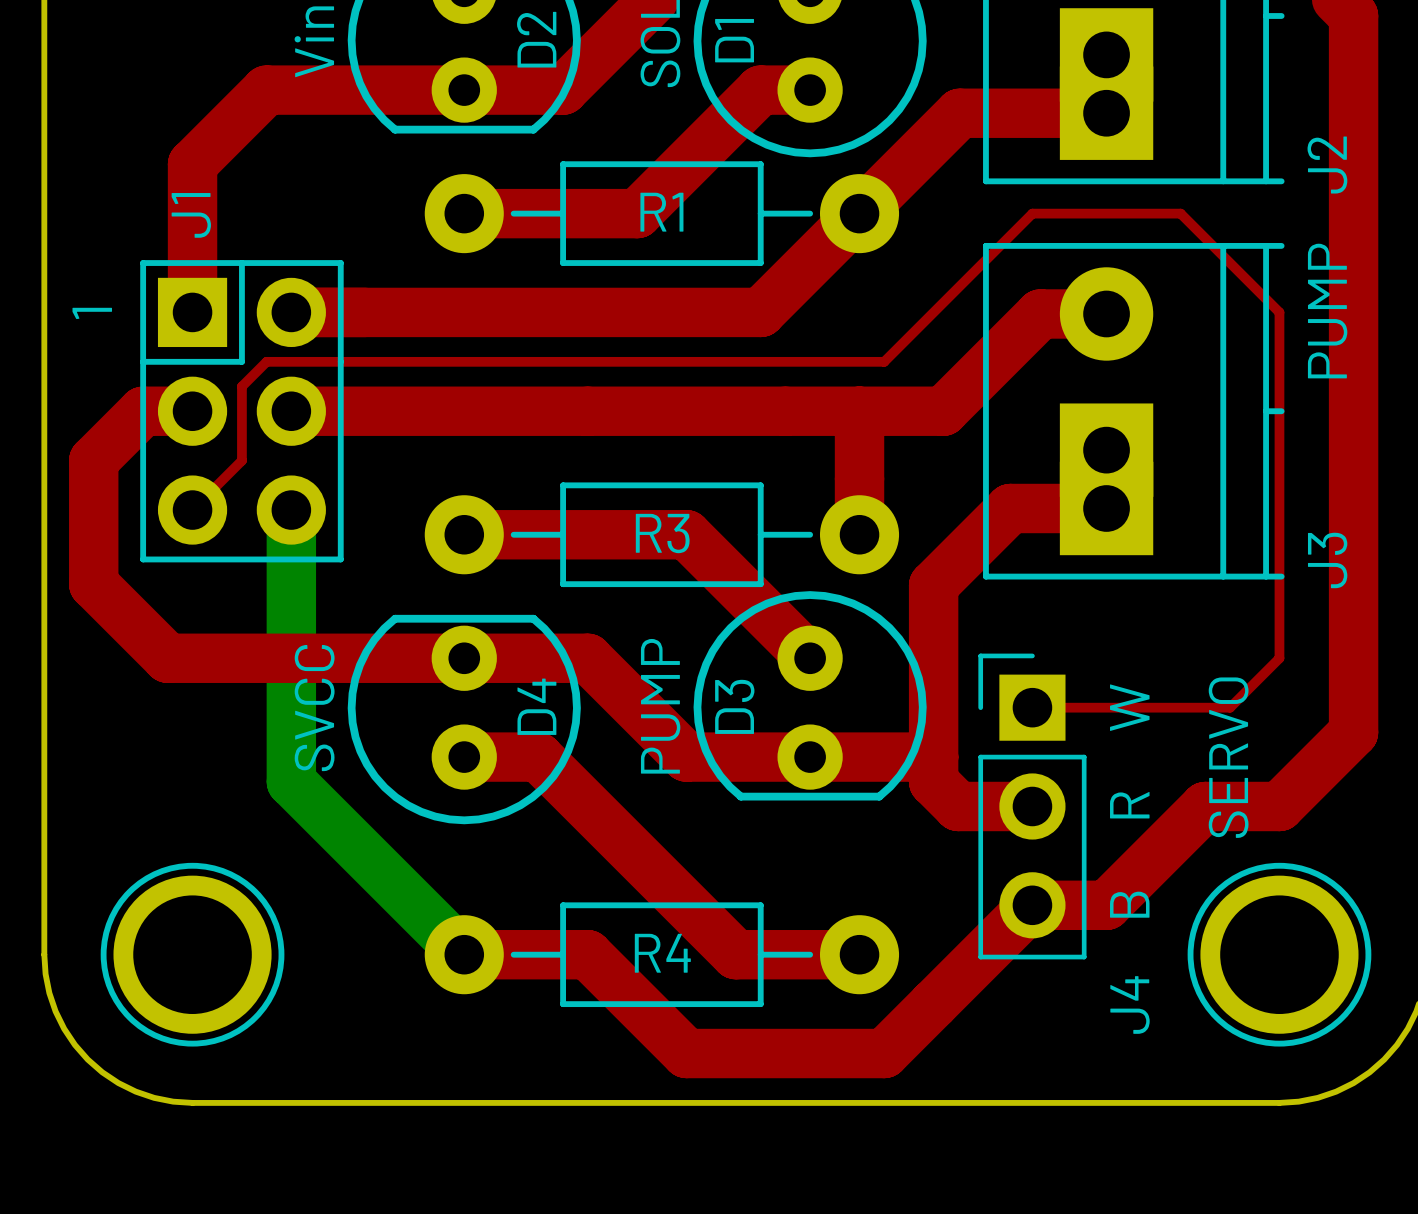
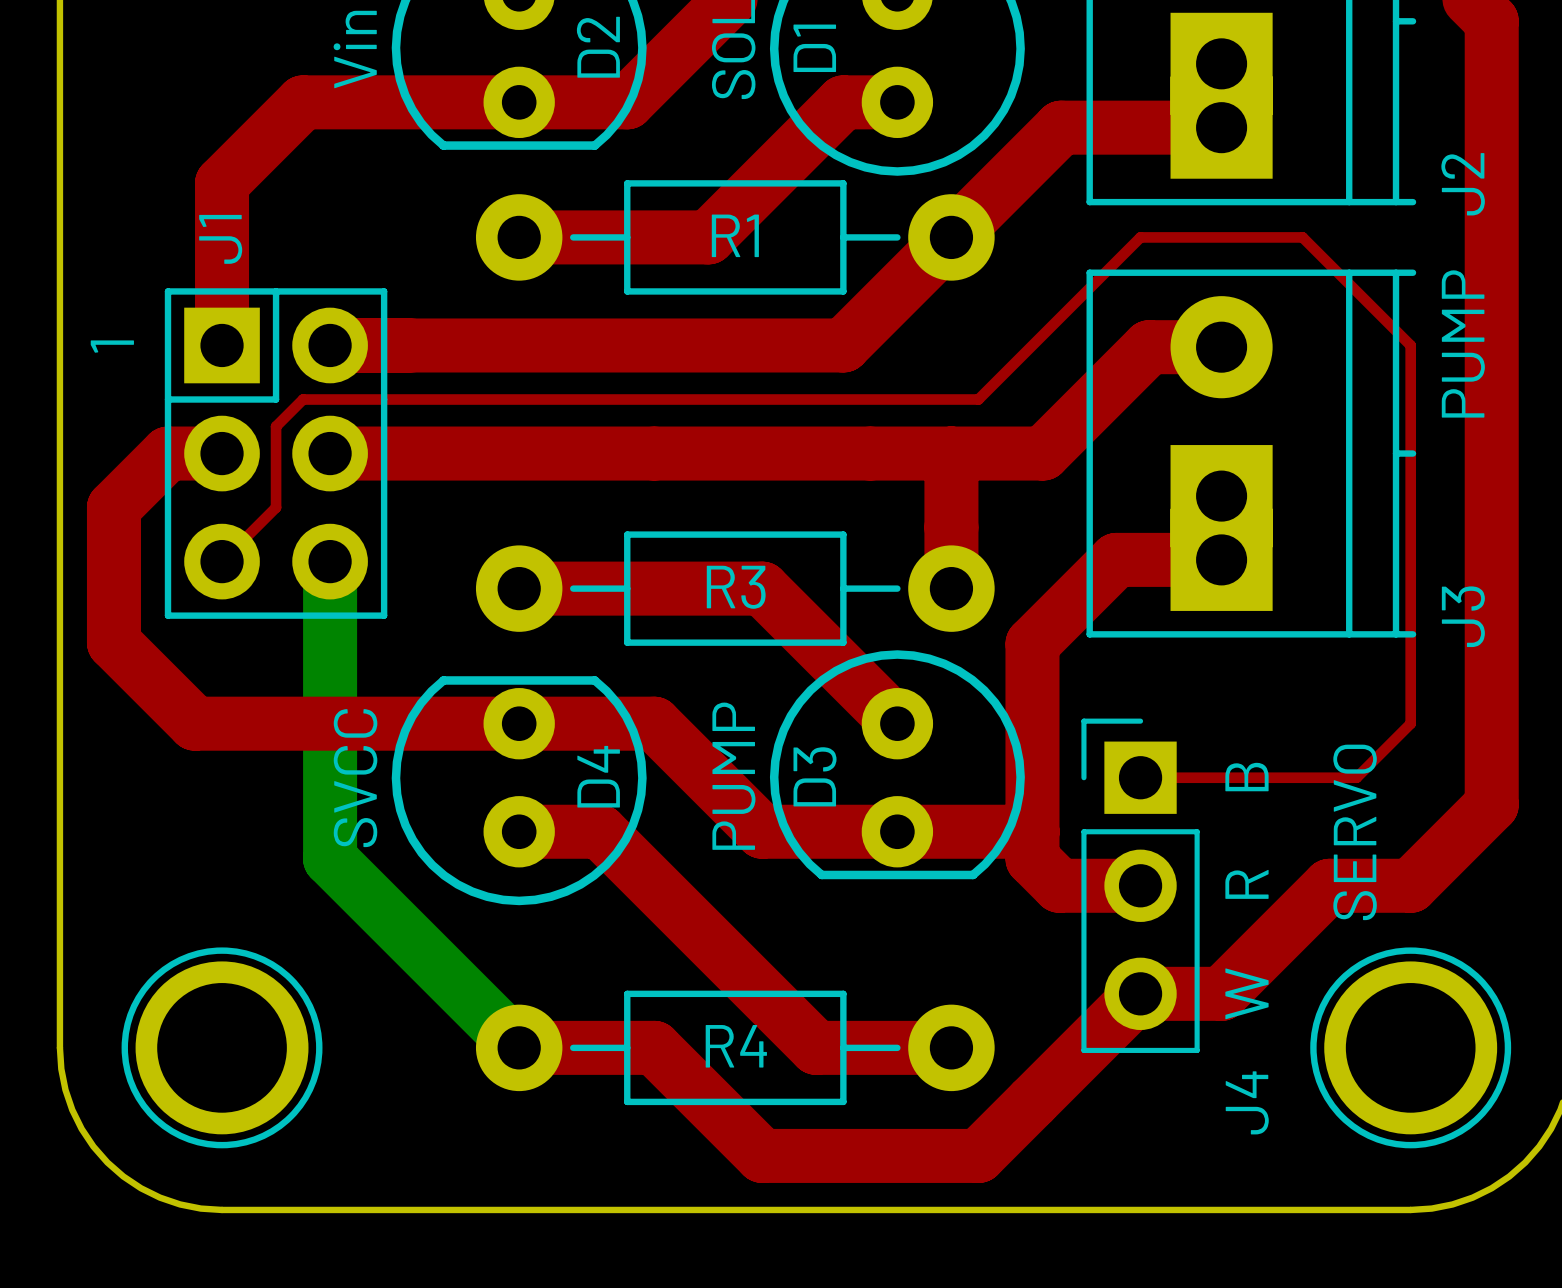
text: W (1129, 707) -> B (1246, 777)
text: B (1129, 904) -> W (1246, 993)

